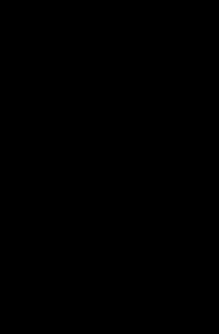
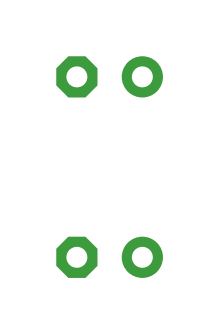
part: none -> (109, 76)
part: none -> (109, 257)

